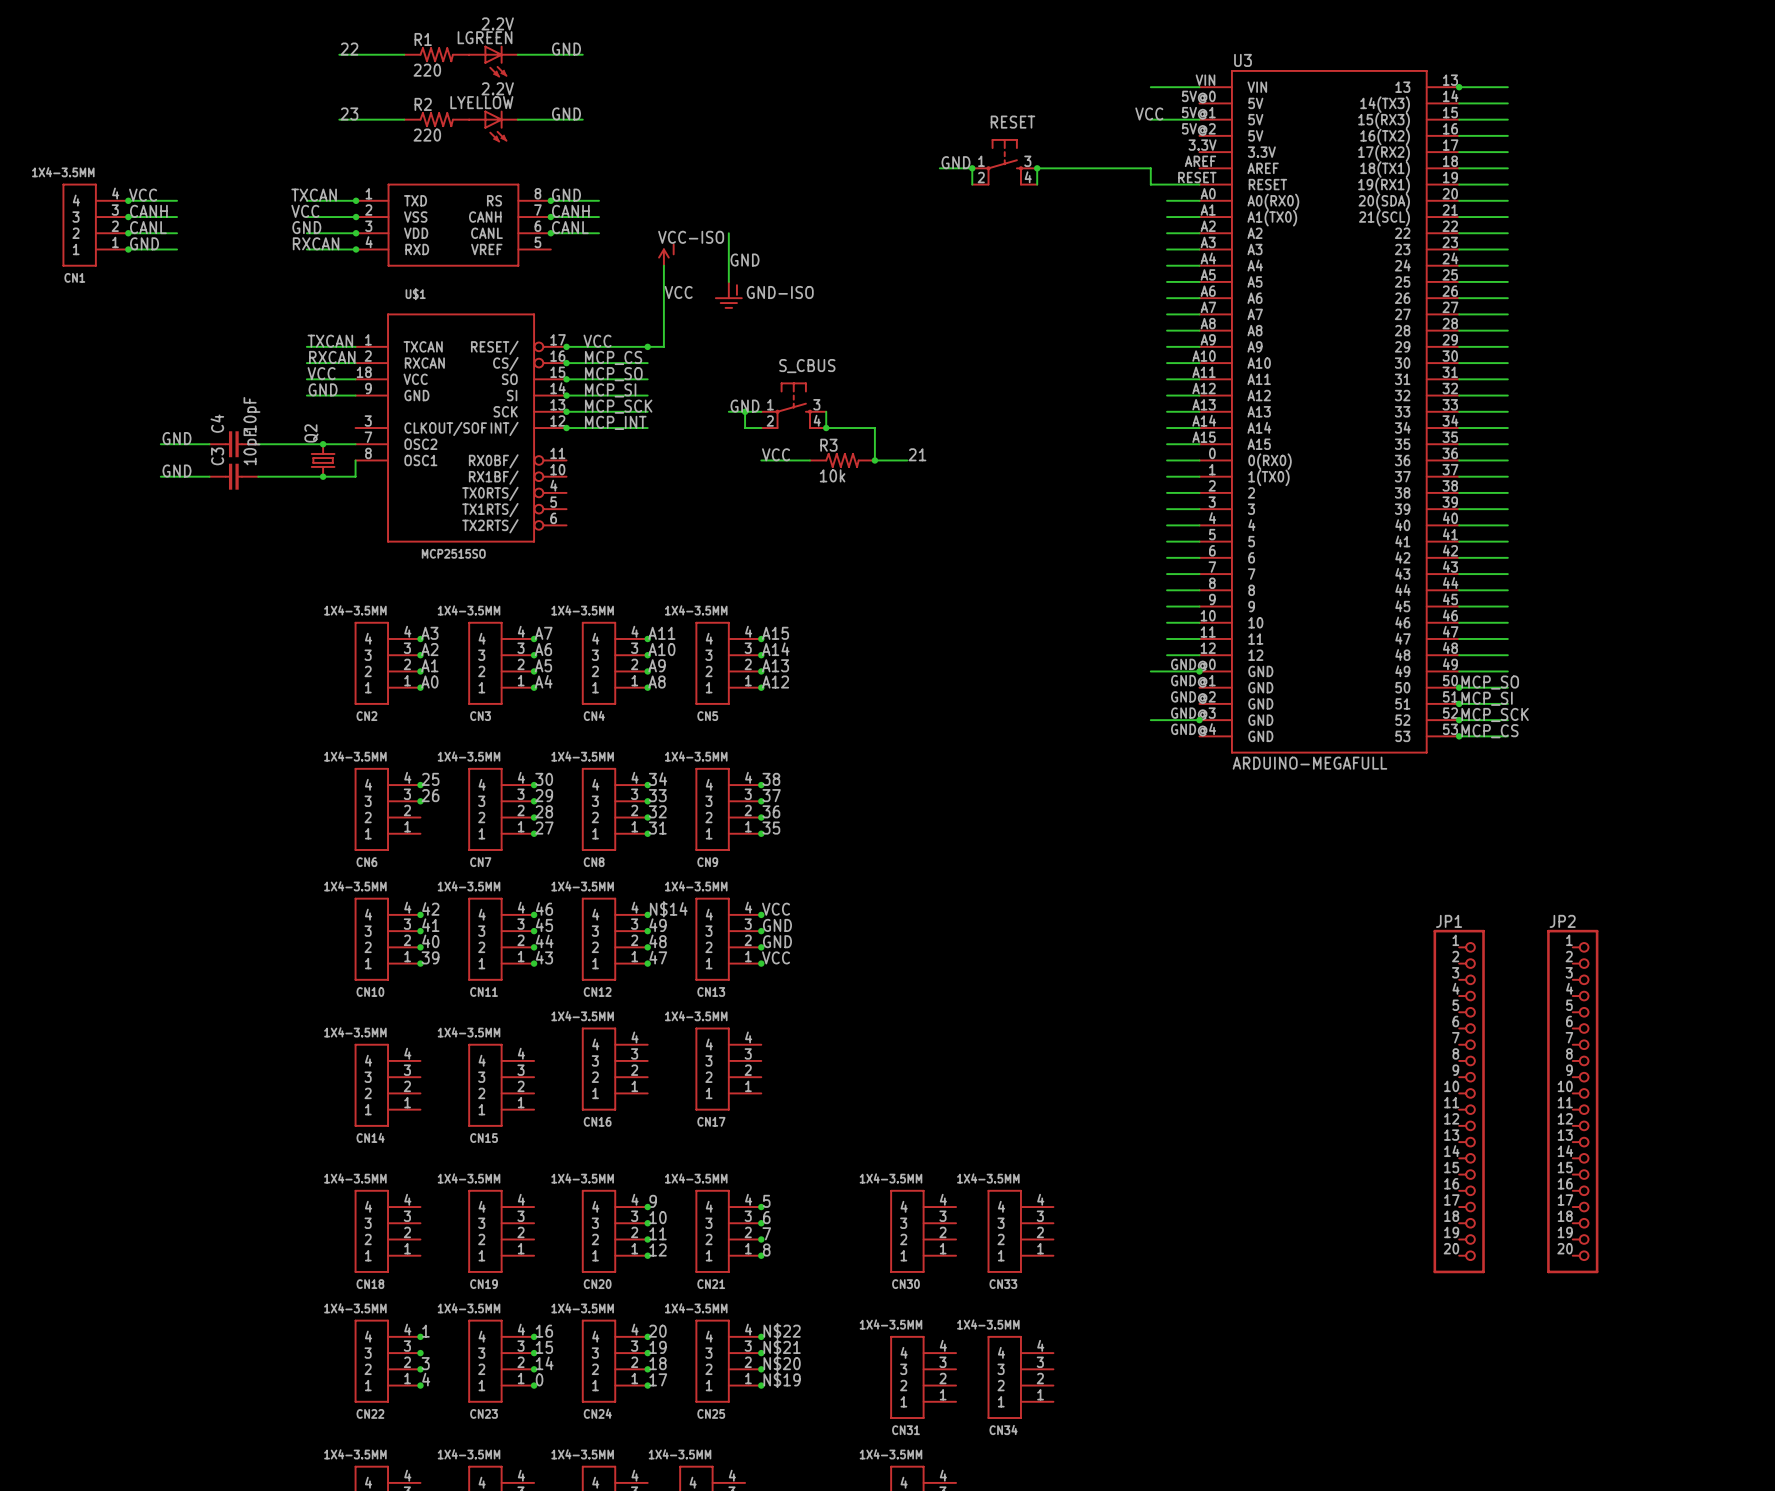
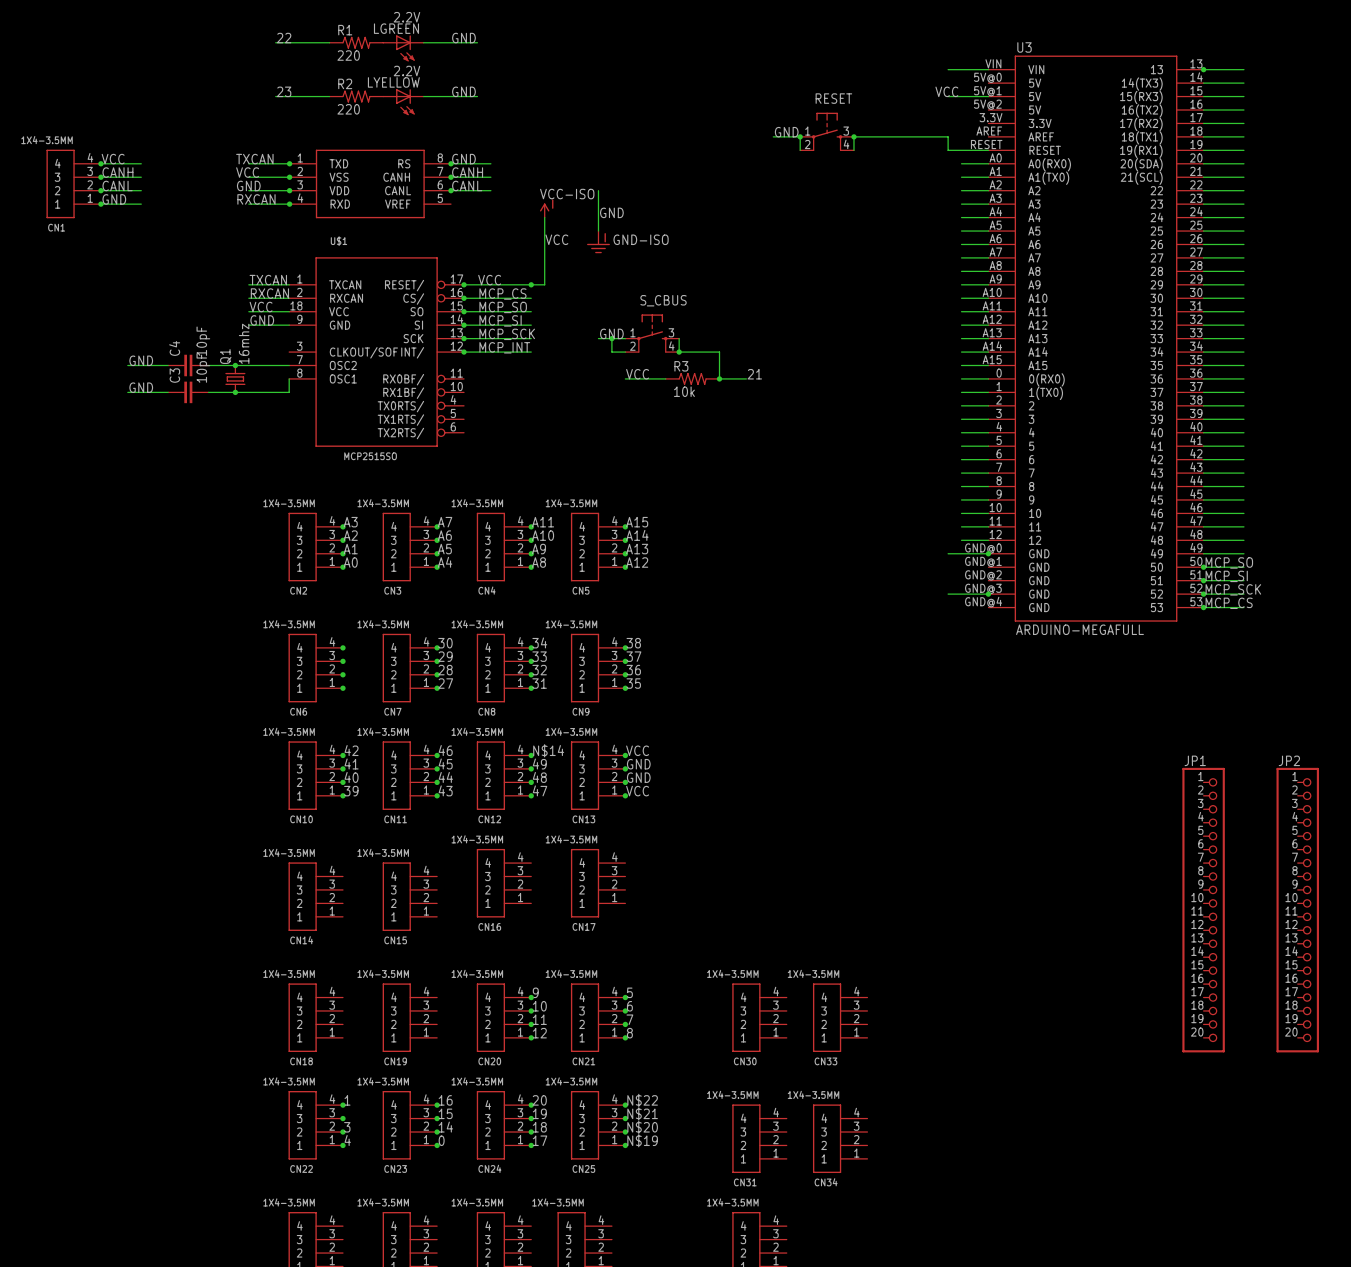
junction: none -> (235, 365)
junction: (323, 444) -> none
Q1: none -> 16mhz (235, 378)
Q2: (323, 460) -> none
junction: none -> (235, 392)
junction: (323, 476) -> none
label: 25 (430, 779) -> none
label: 26 (430, 795) -> none
junction: none -> (342, 674)
junction: none -> (342, 688)

